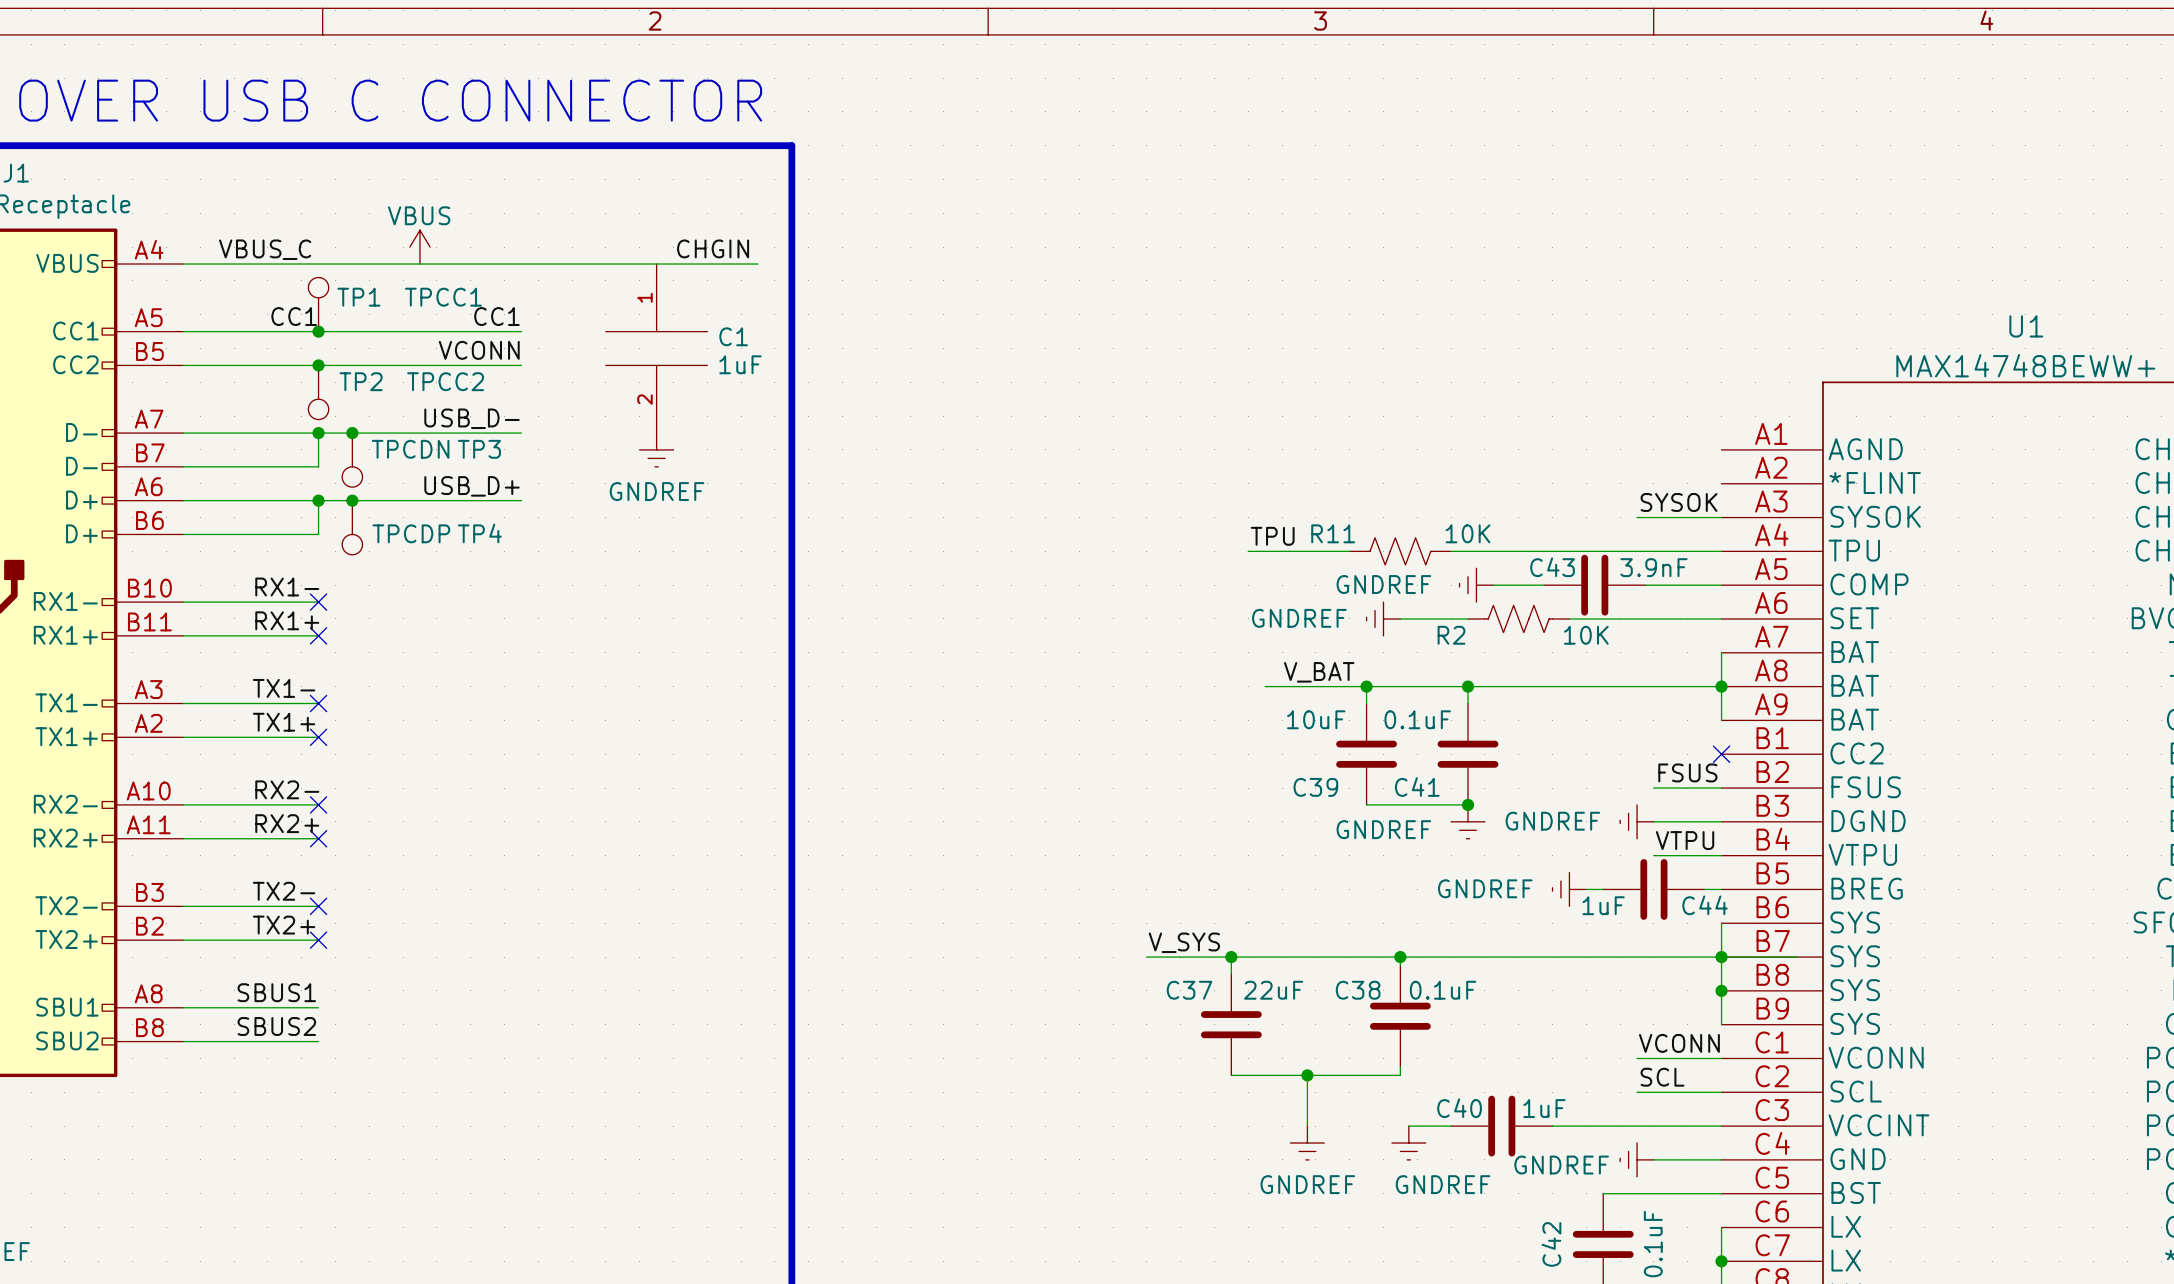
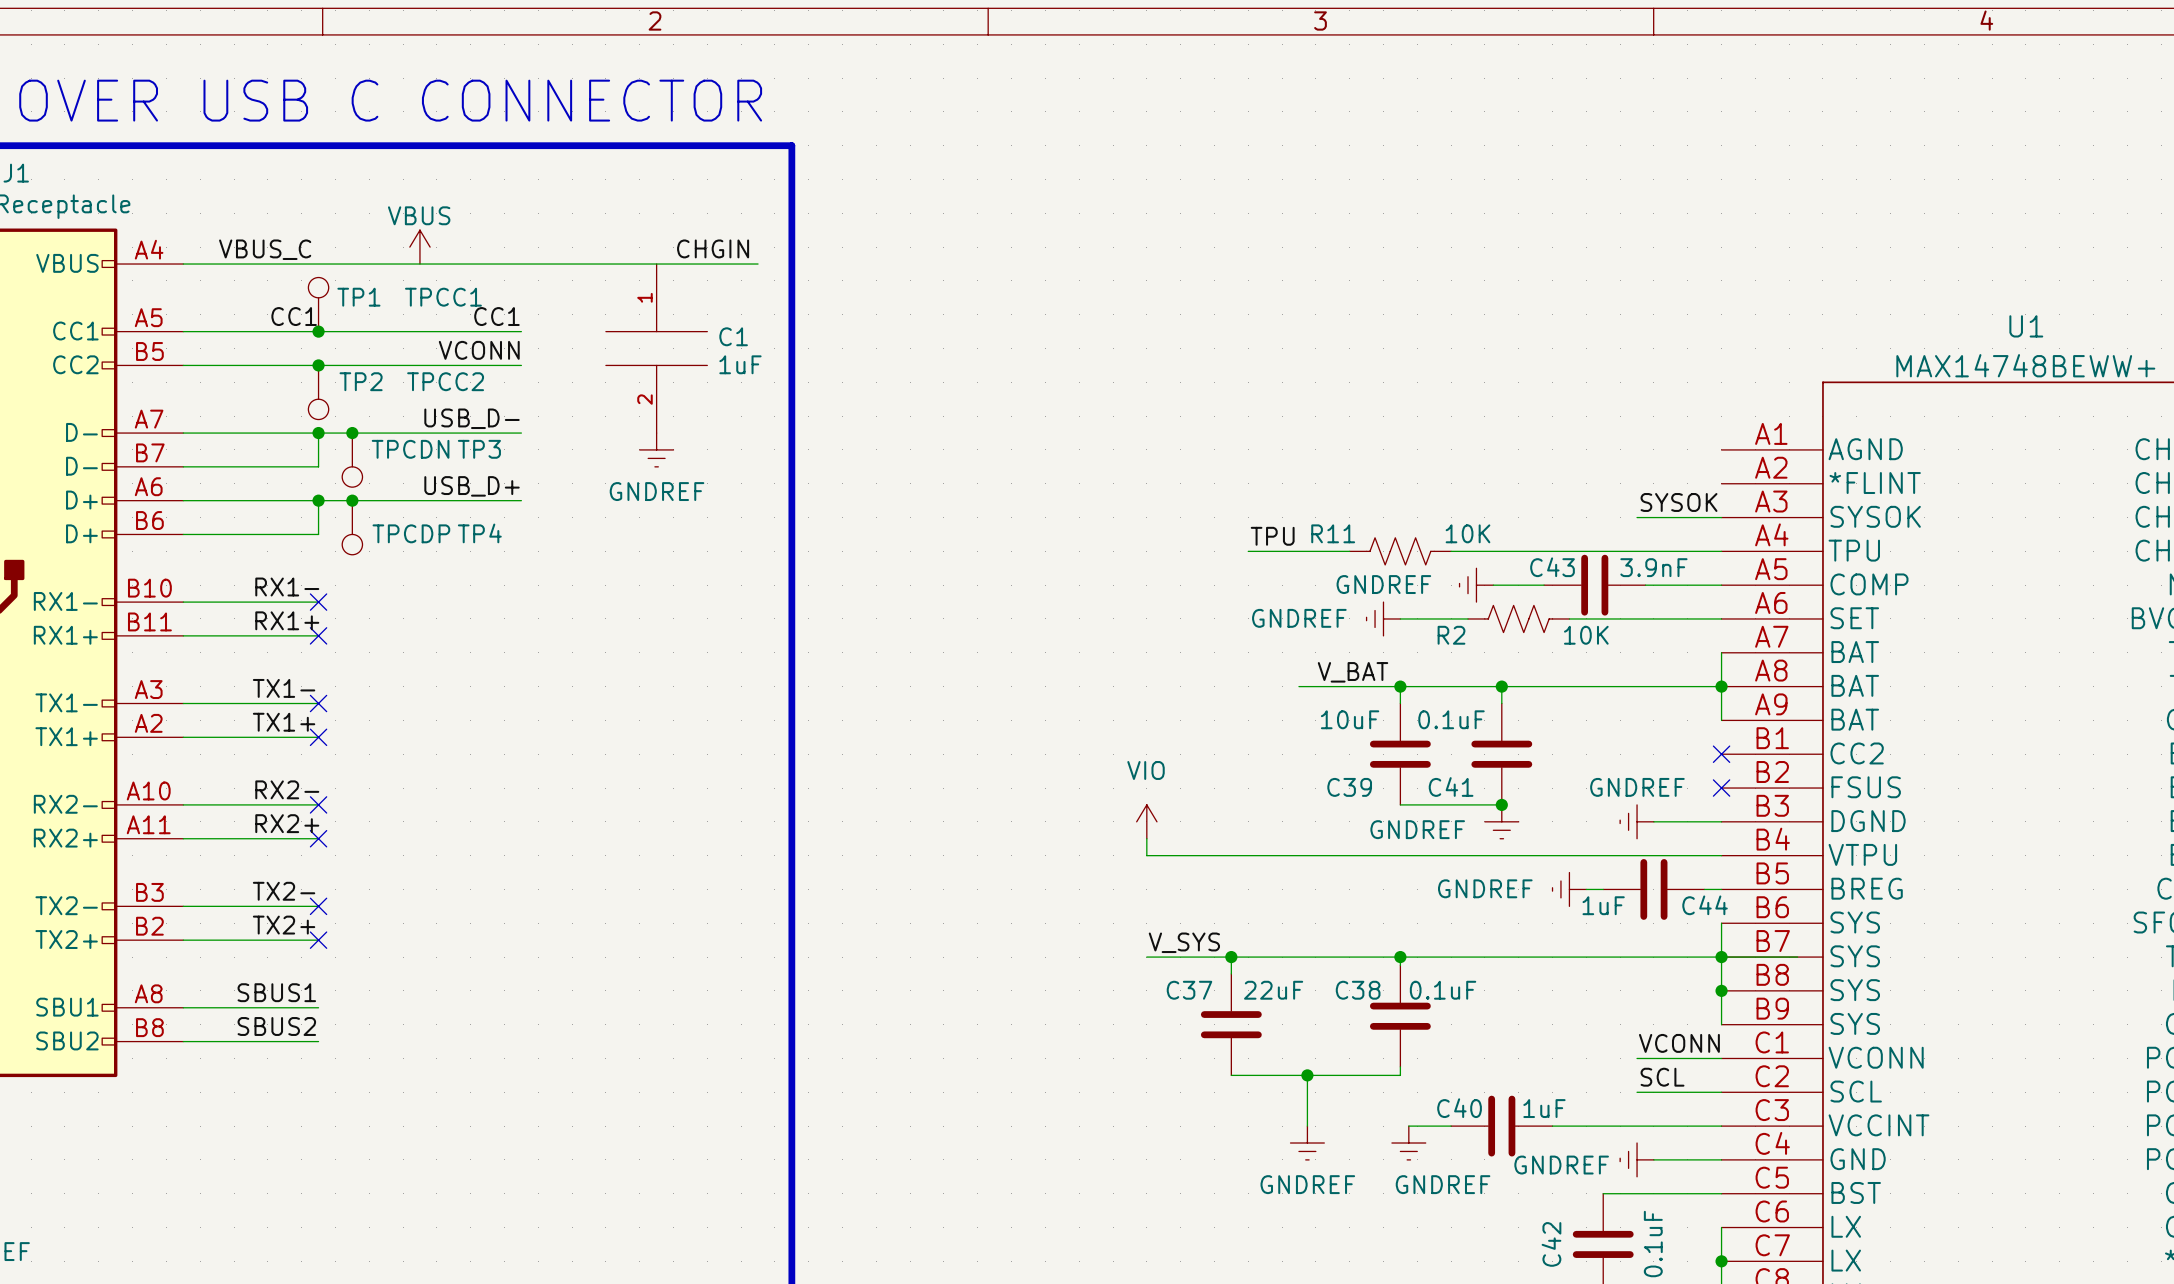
label position: V_BAT (1319, 672) -> V_BAT (1353, 672)
wire: (1265, 686) (1298, 686) -> none
wire: (1366, 686) (1366, 703) -> (1400, 686) (1400, 703)
junction: (1366, 686) -> none
junction: none -> (1400, 686)
wire: (1468, 686) (1468, 703) -> (1501, 686) (1501, 703)
junction: (1468, 686) -> none
junction: none -> (1501, 686)
C39 position: (1366, 754) -> (1400, 754)
C41 position: (1468, 754) -> (1501, 754)
label: FSUS (1687, 772) -> none
wire: (1653, 788) (1721, 788) -> none
no-connect mark: none -> (1721, 788)
wire: (1366, 804) (1400, 804) -> (1468, 804) (1501, 804)
junction position: (1468, 804) -> (1501, 804)
power symbol: none -> VIO (1146, 821)
power symbol position: GNDREF (1468, 821) -> GNDREF (1501, 821)
power symbol text position: GNDREF (1552, 821) -> GNDREF (1637, 787)
wire: none -> (1146, 838) (1146, 855) (1653, 855)
label: VTPU (1685, 840) -> none

